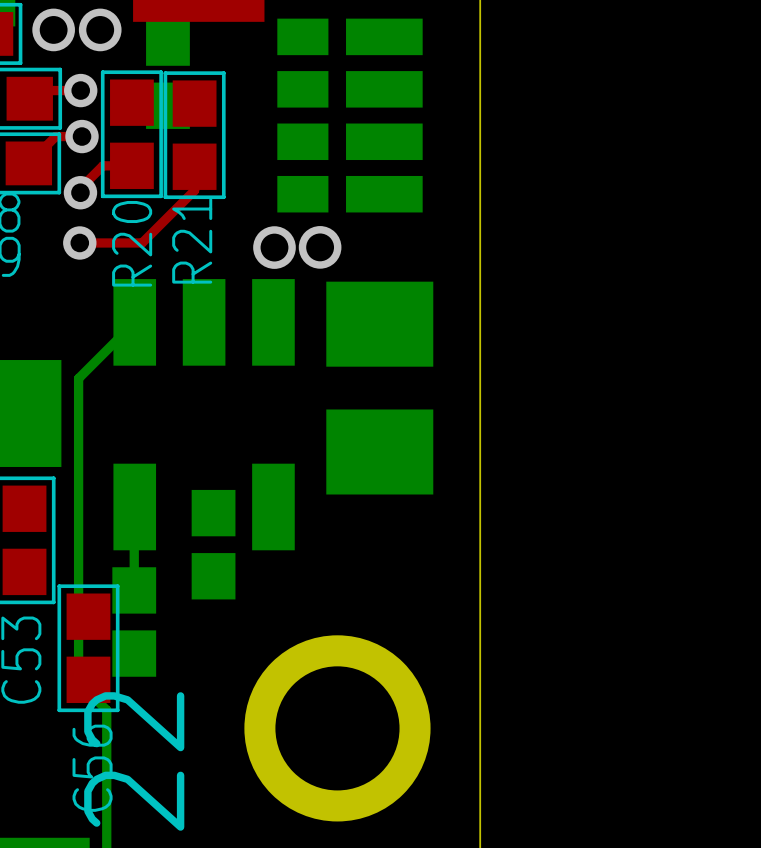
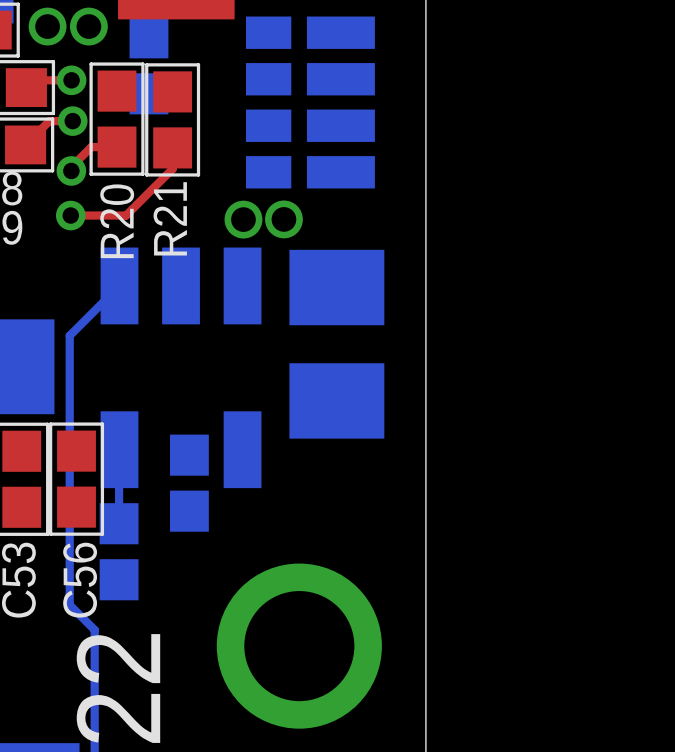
C56 position: (88, 648) -> (76, 479)

